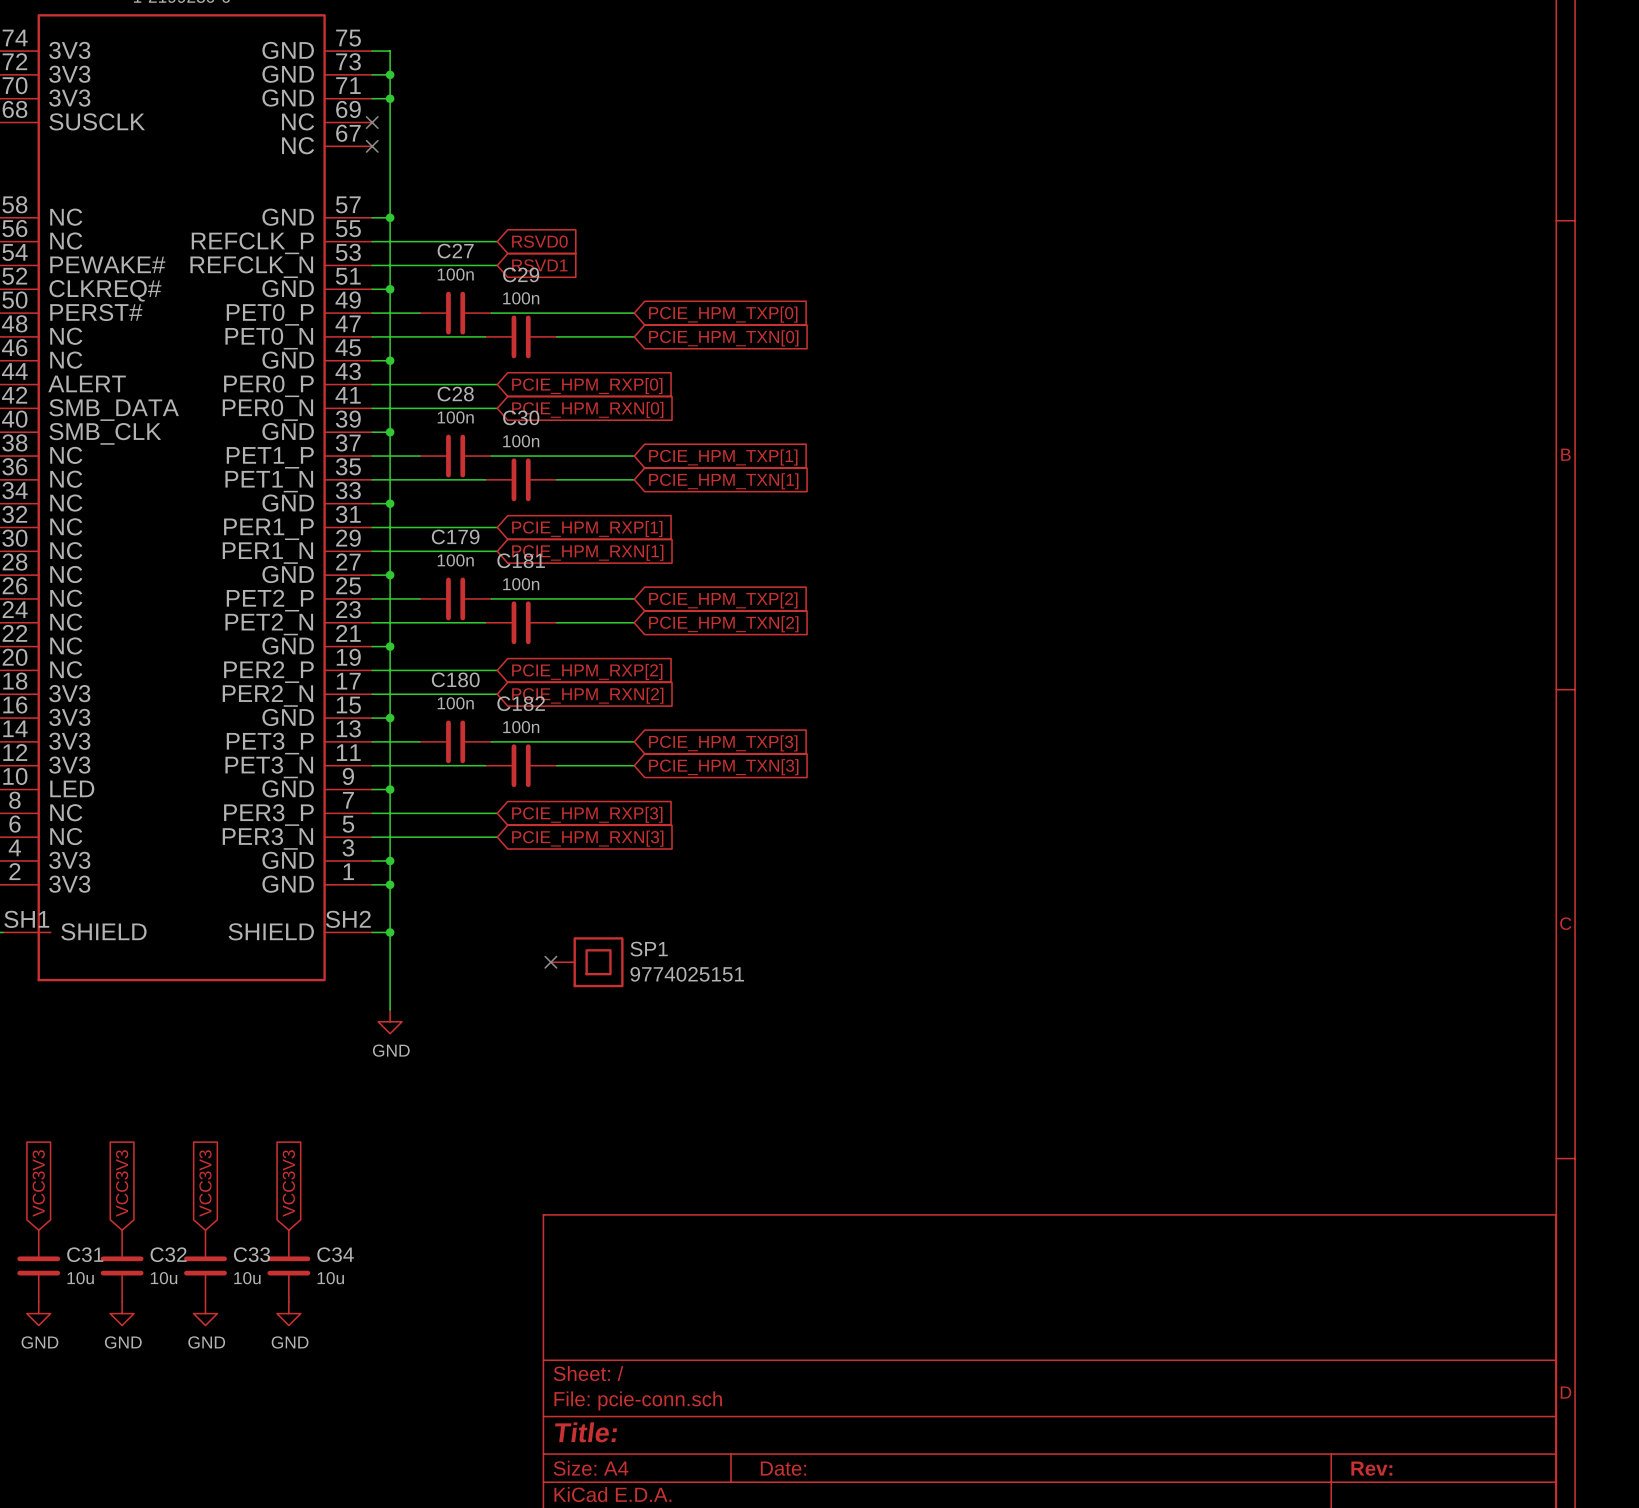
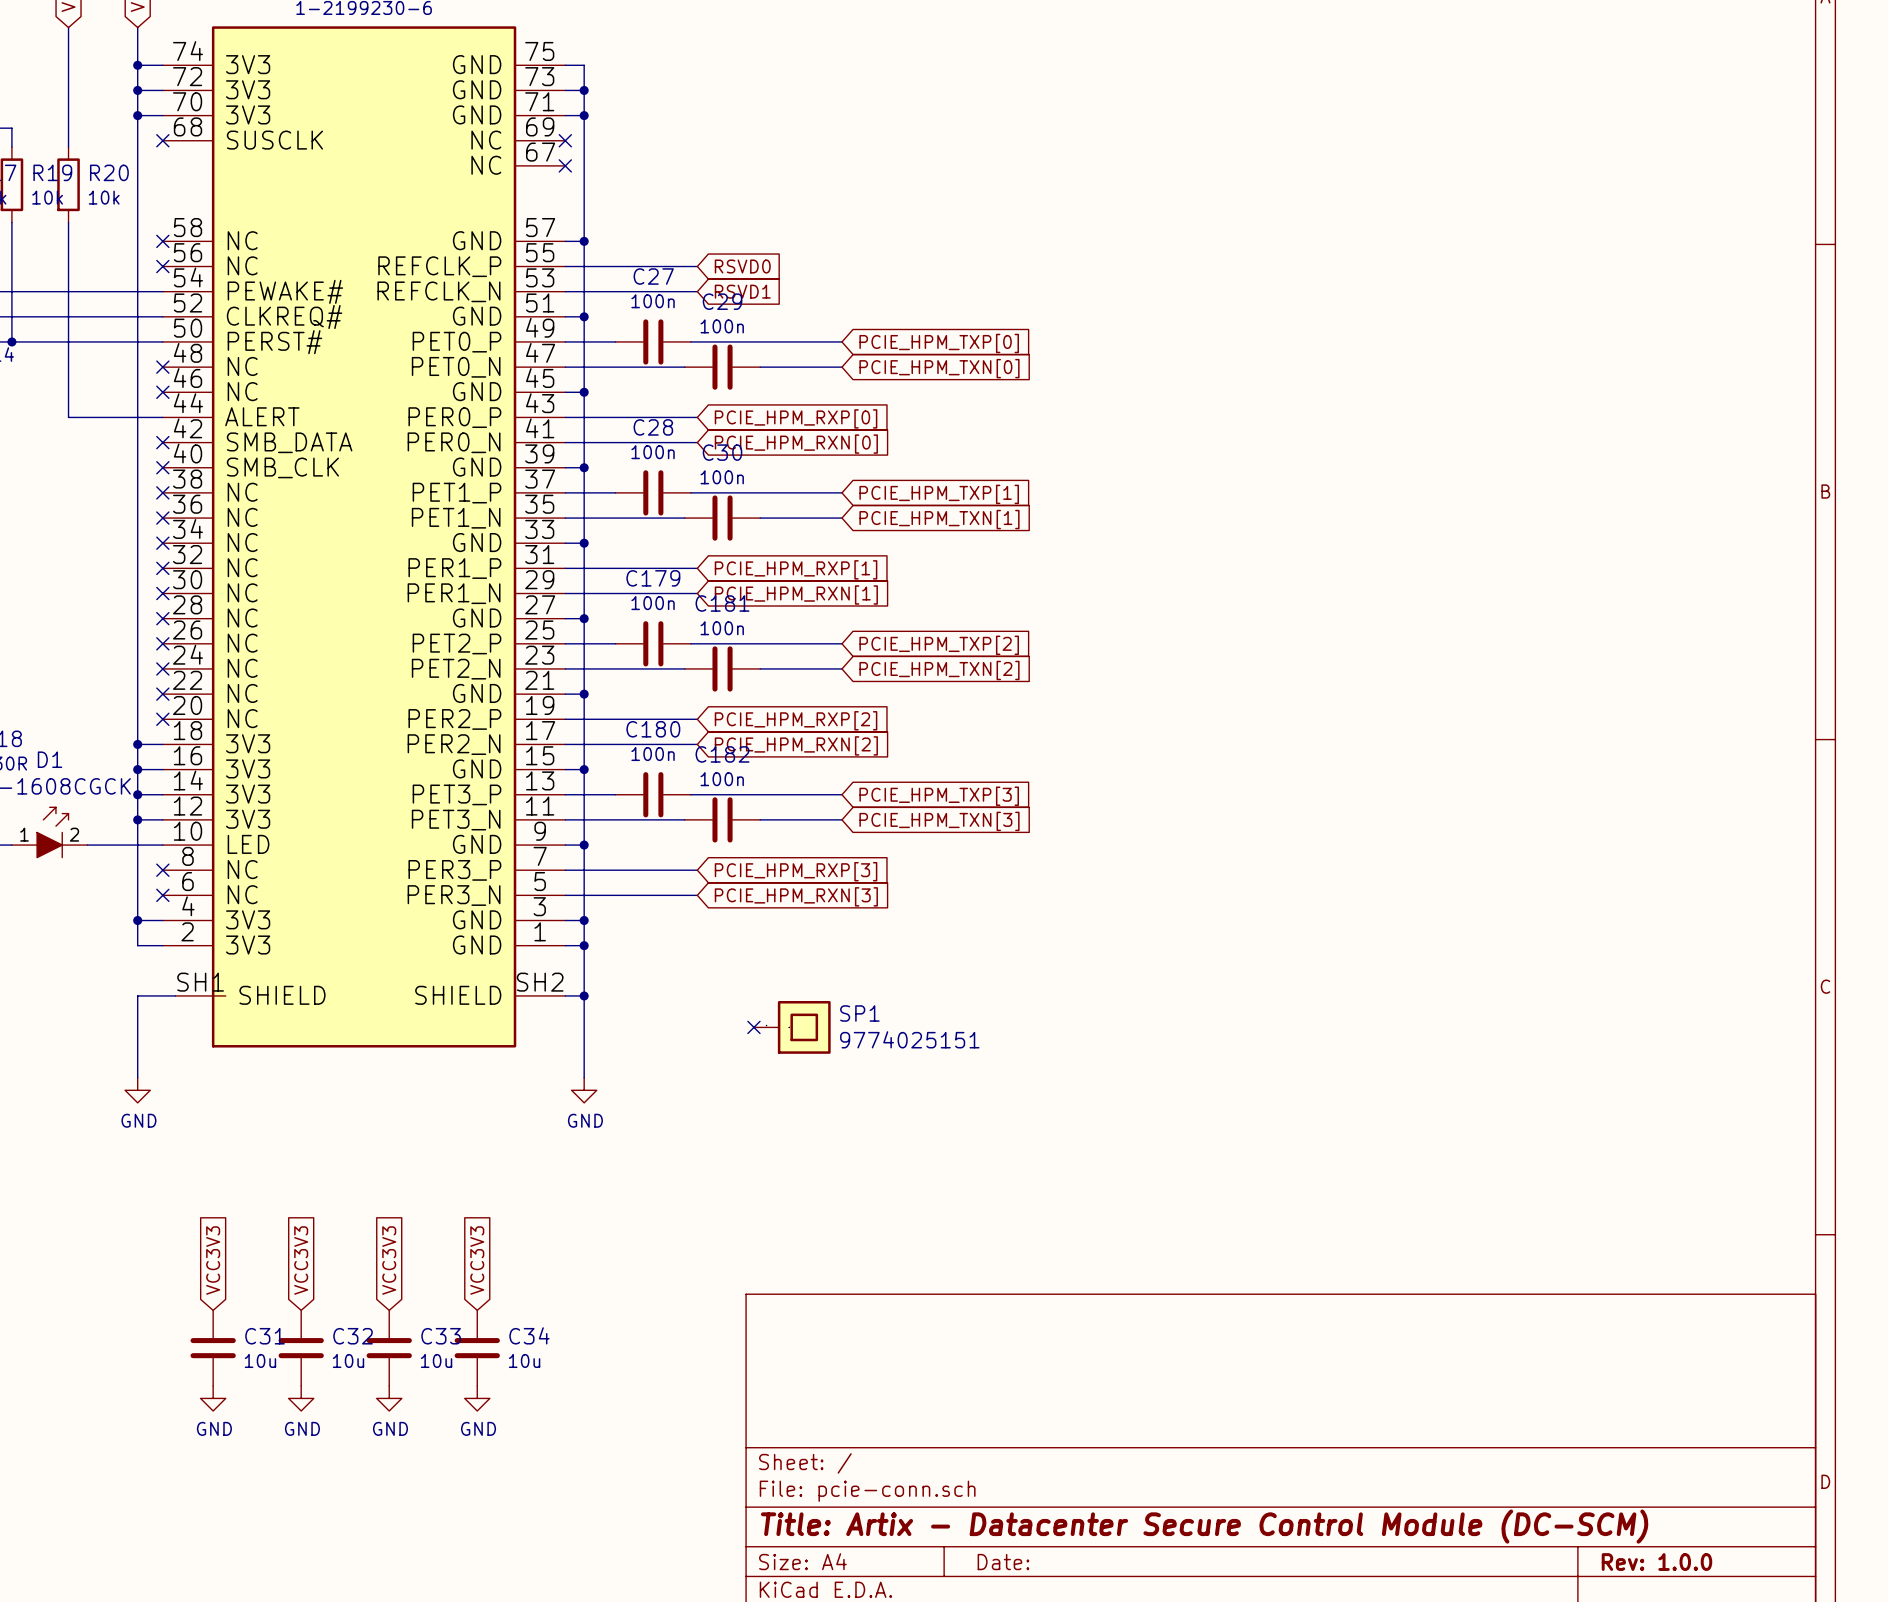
title block: Title: (586, 1432) -> Title: Artix - Datacenter Secure Control Module (DC-SCM) (1204, 1526)
title block: Rev: (1371, 1468) -> Rev: 1.0.0 (1656, 1562)

